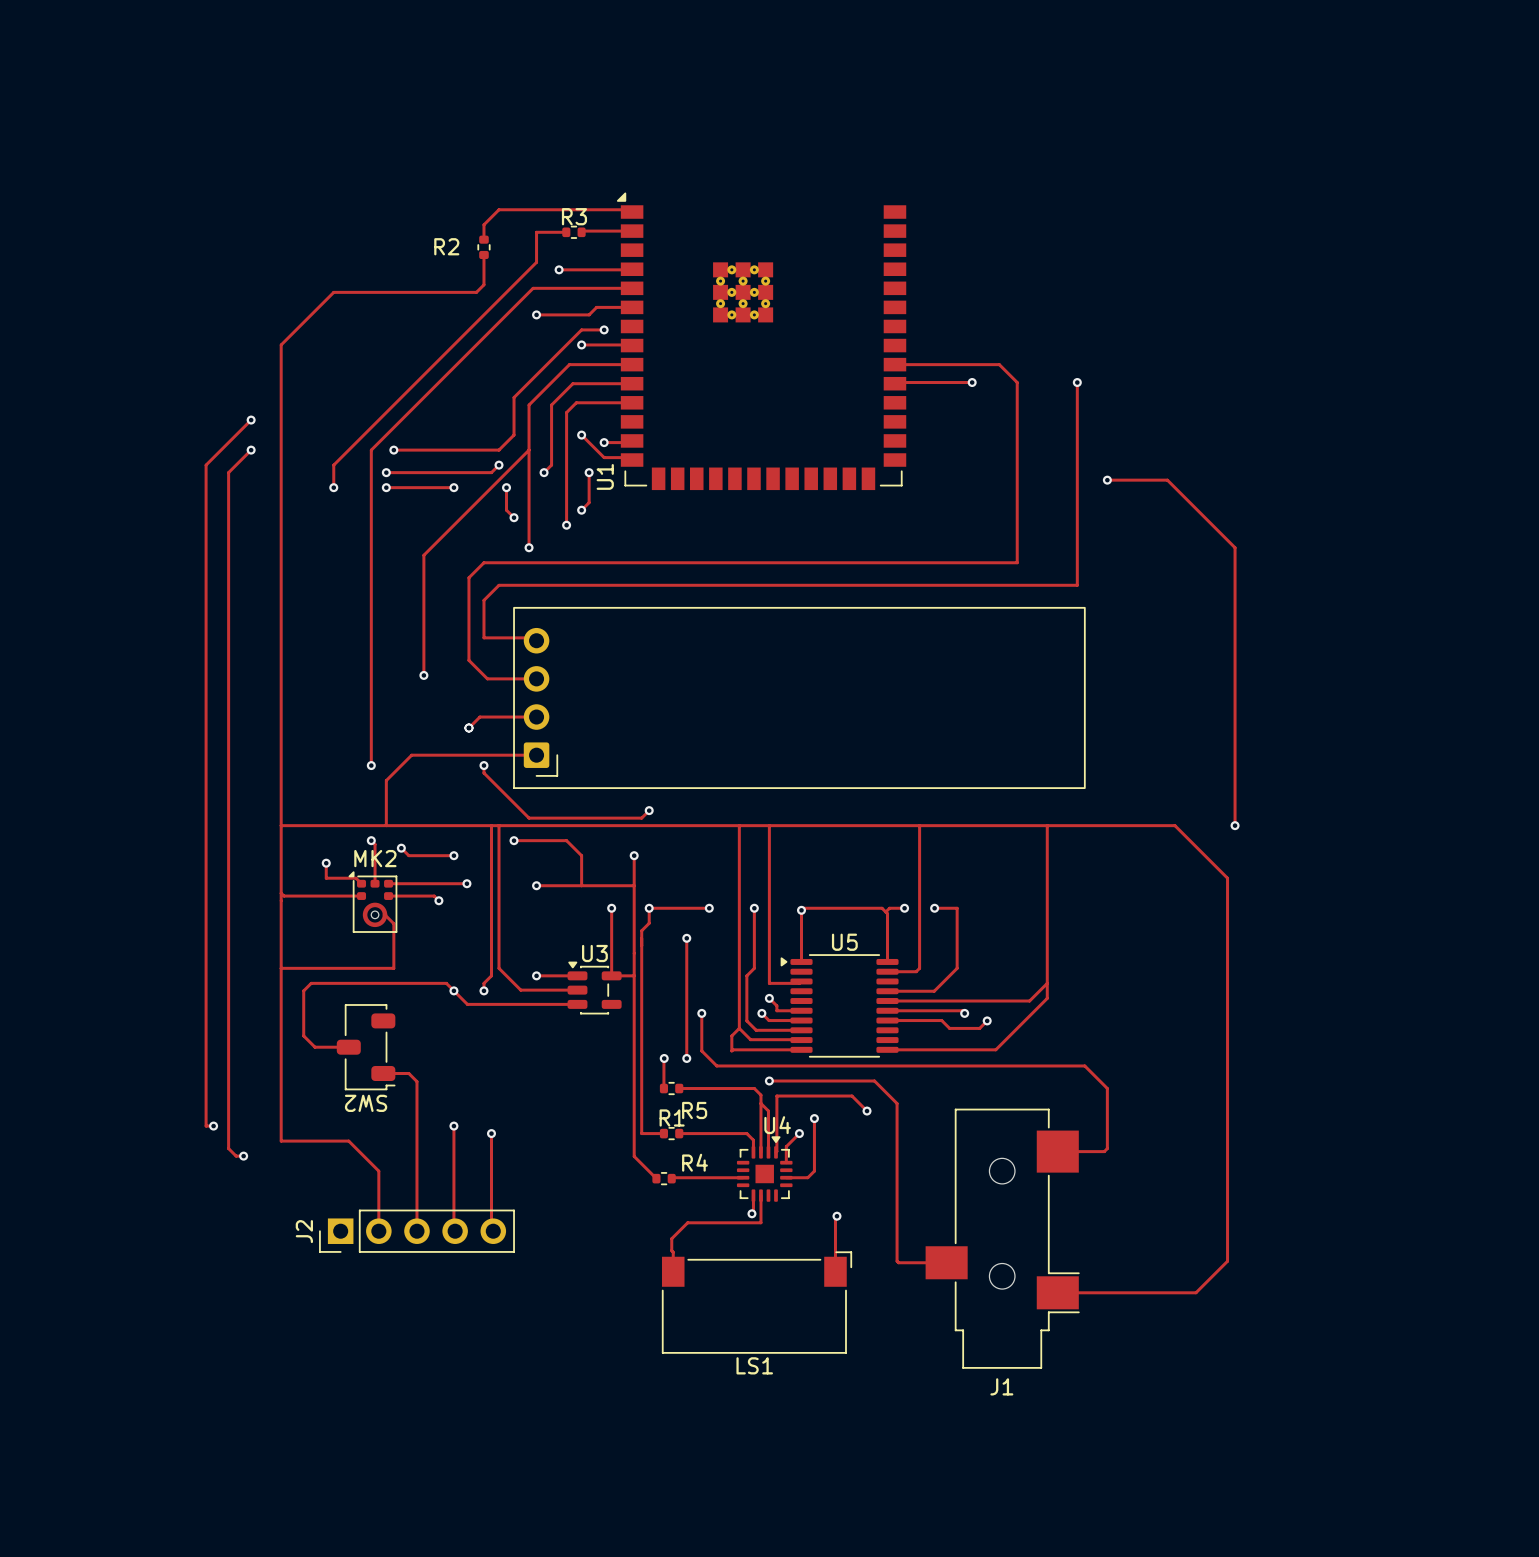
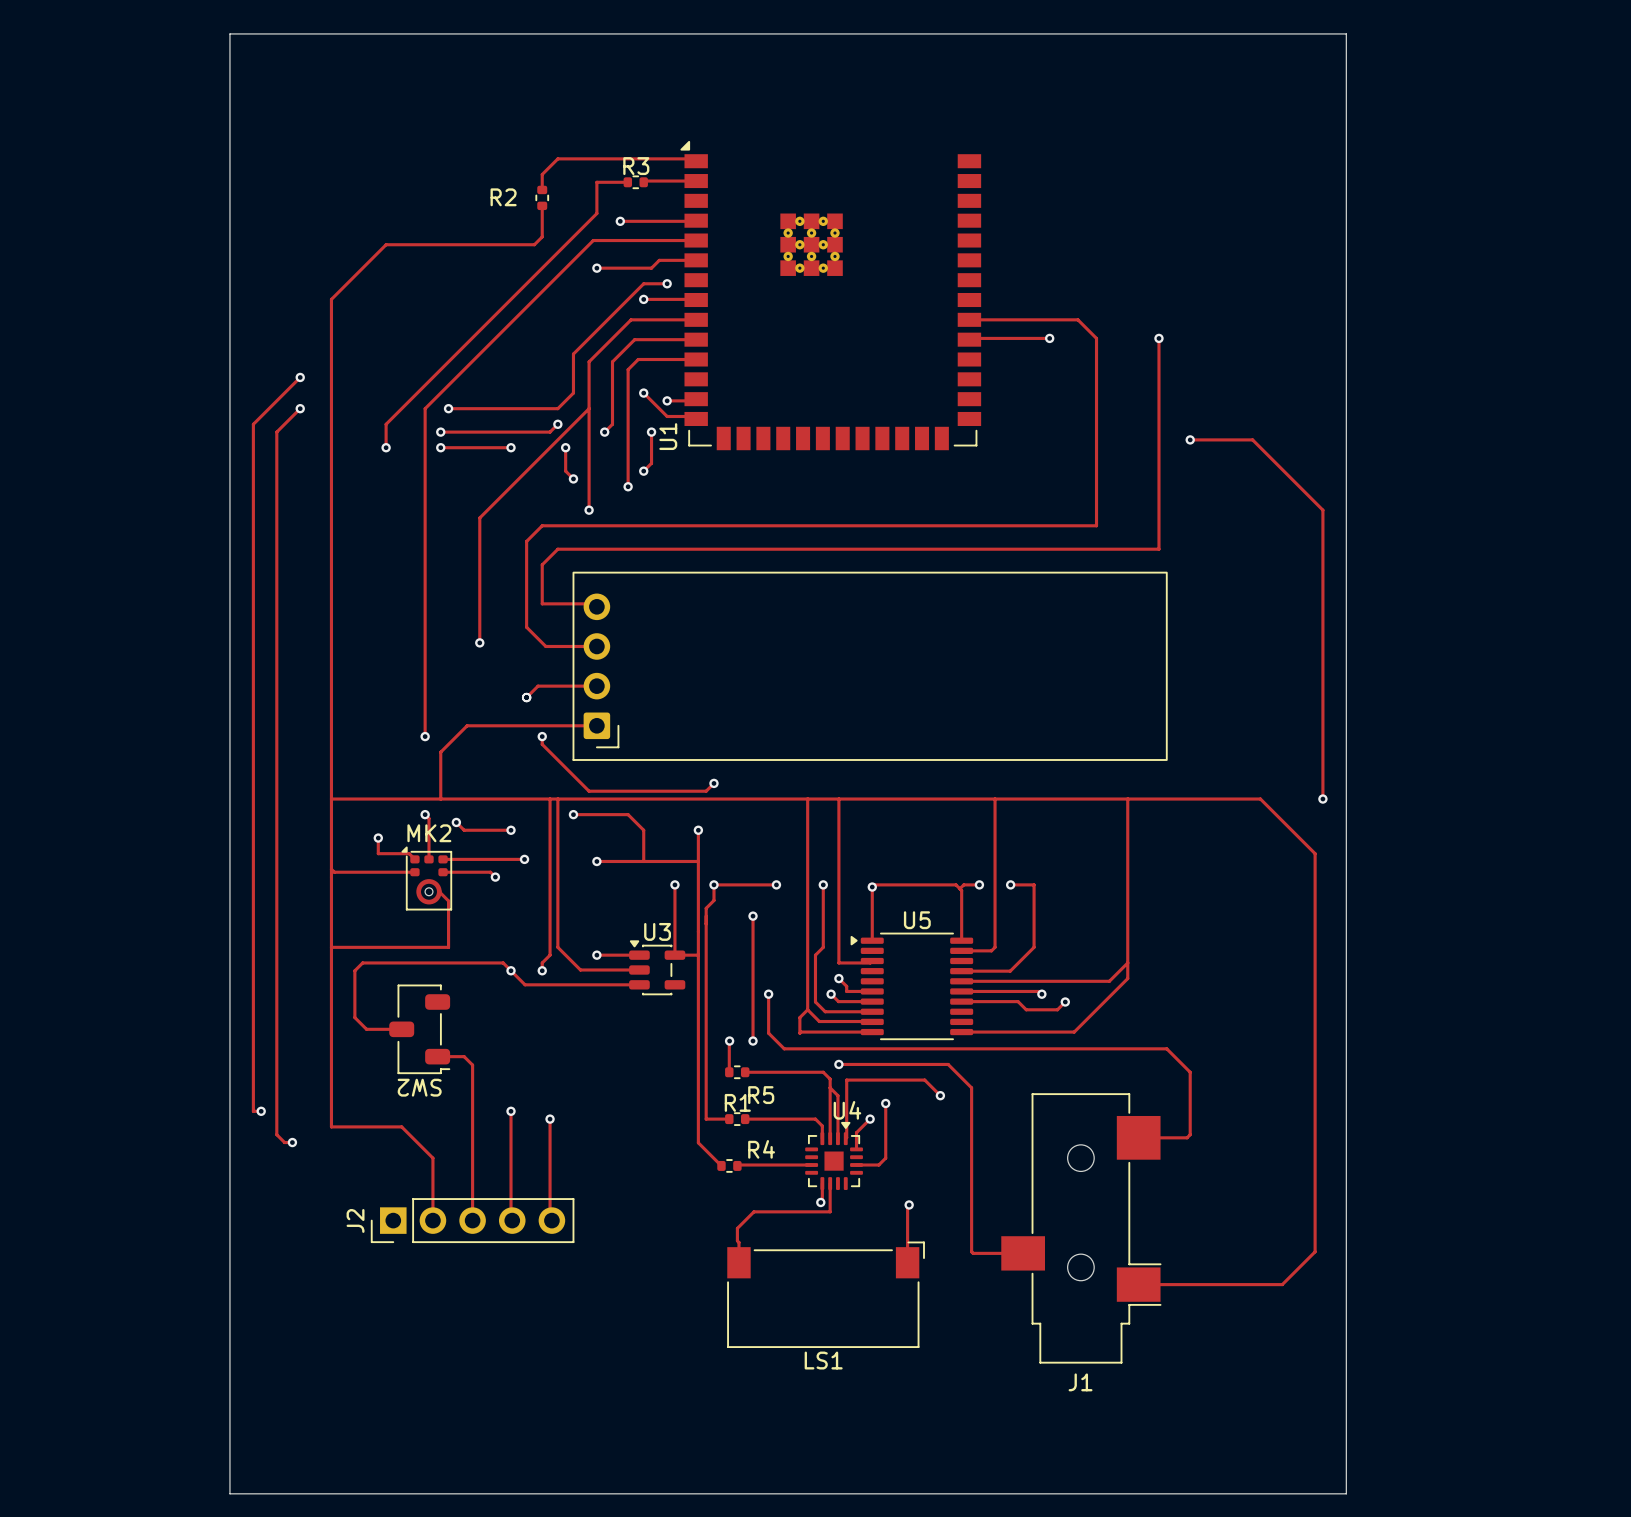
board edge: none -> (229, 33) (1346, 33) (1346, 1493) (229, 1493) (229, 33)

